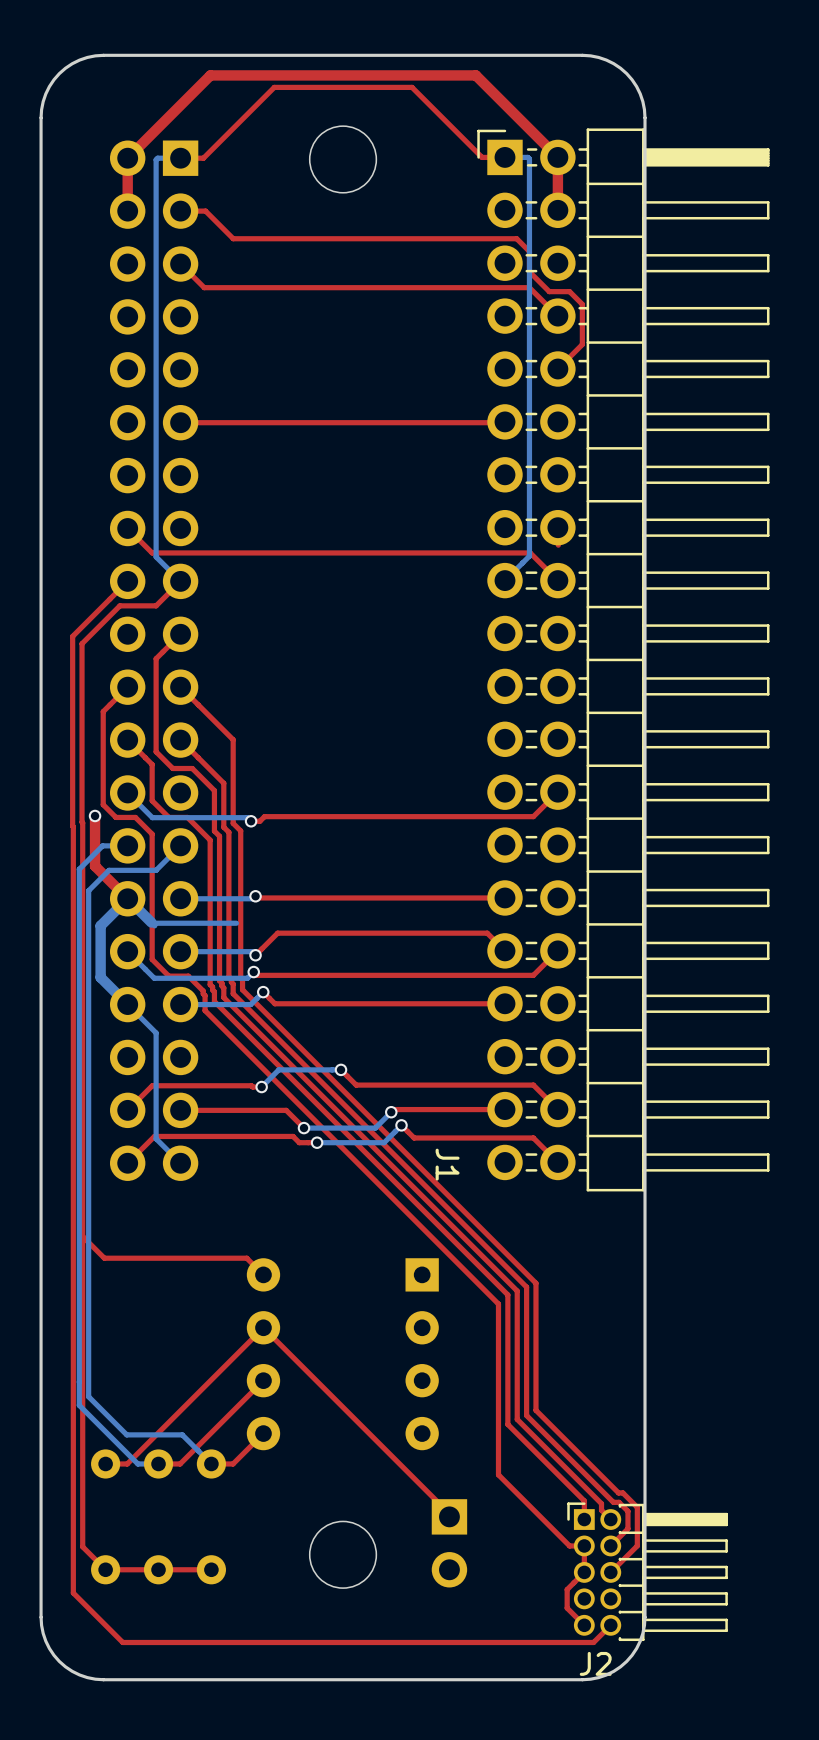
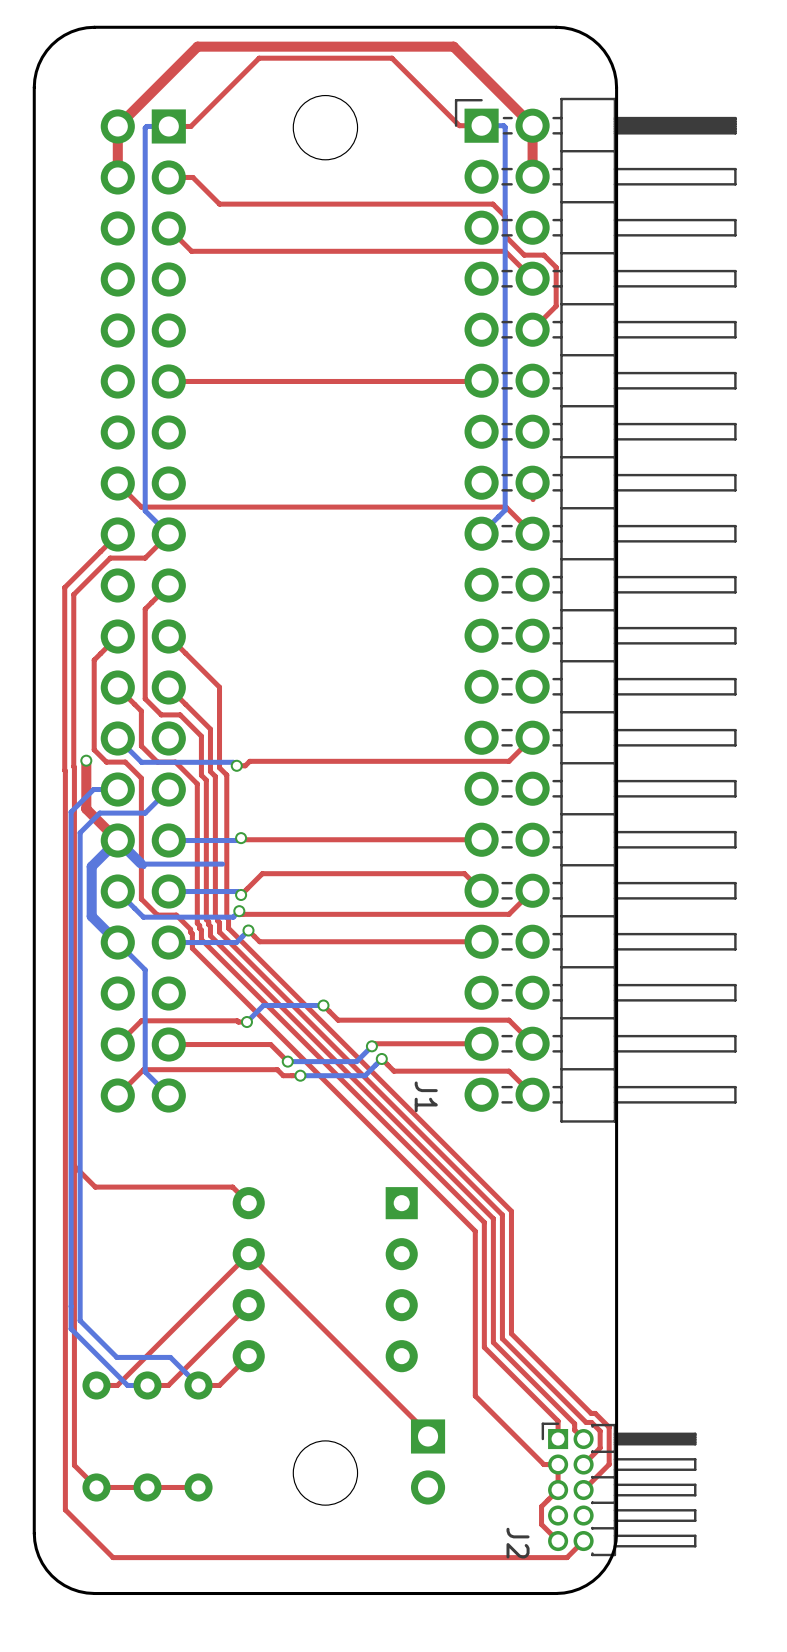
J2 name rotation: 0° (595, 1663) -> 90° clockwise (518, 1543)
J2 name position: J2 (595, 1663) -> J2 (518, 1543)

